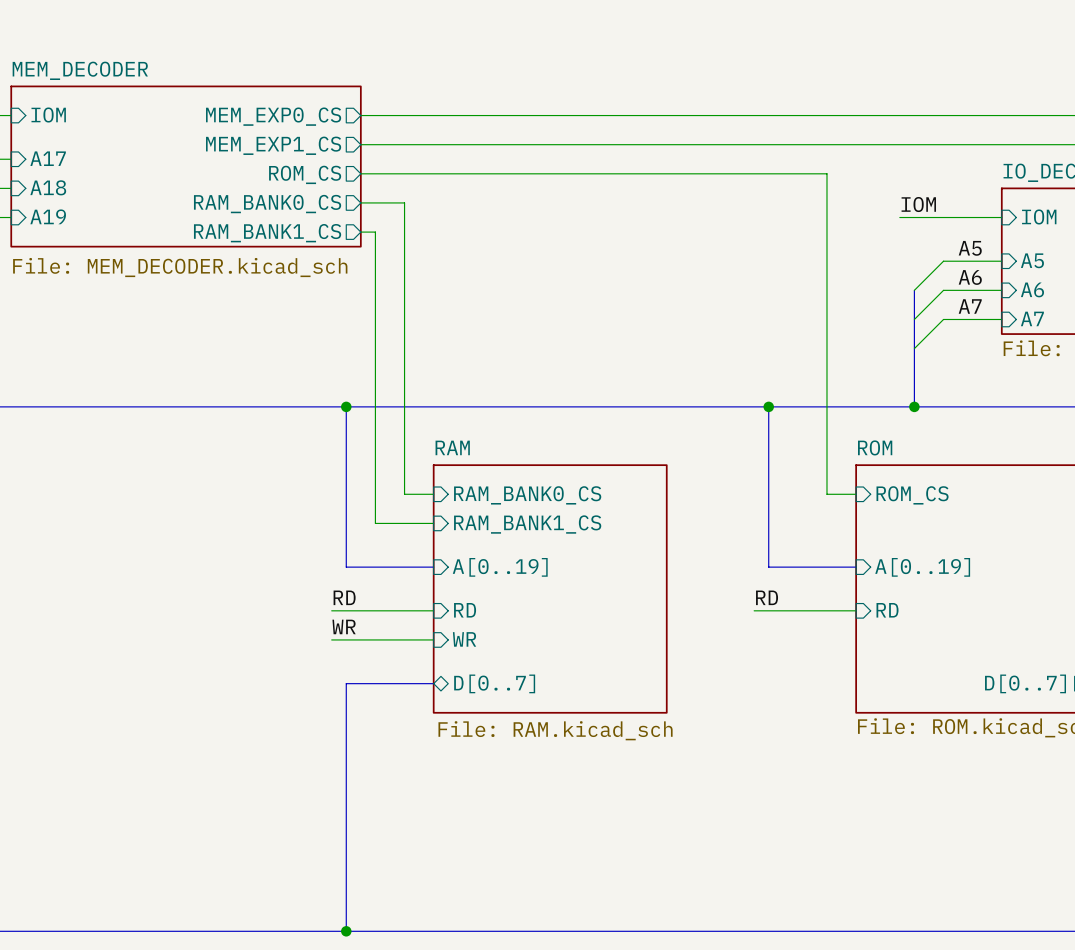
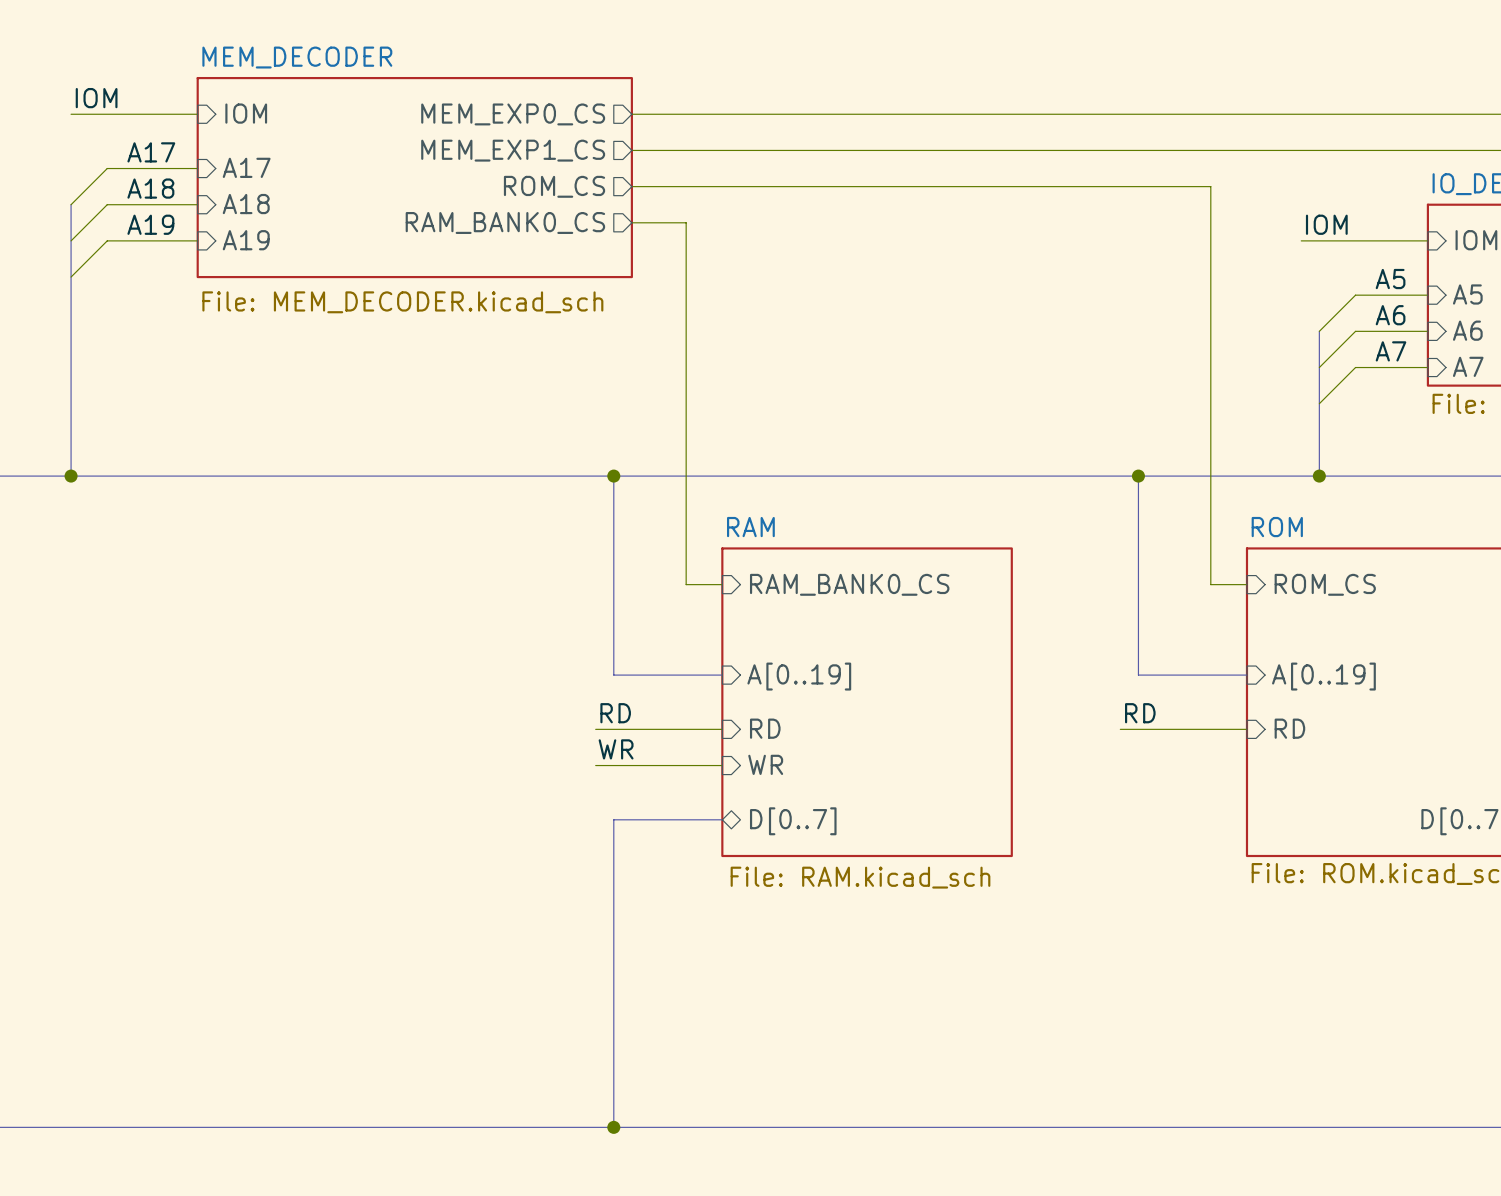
wire: (360, 232) (375, 232) (375, 523) (433, 523) -> none
sheet pin: RAM_BANK1_CS (267, 233) -> none
sheet pin: RAM_BANK1_CS (527, 524) -> none

